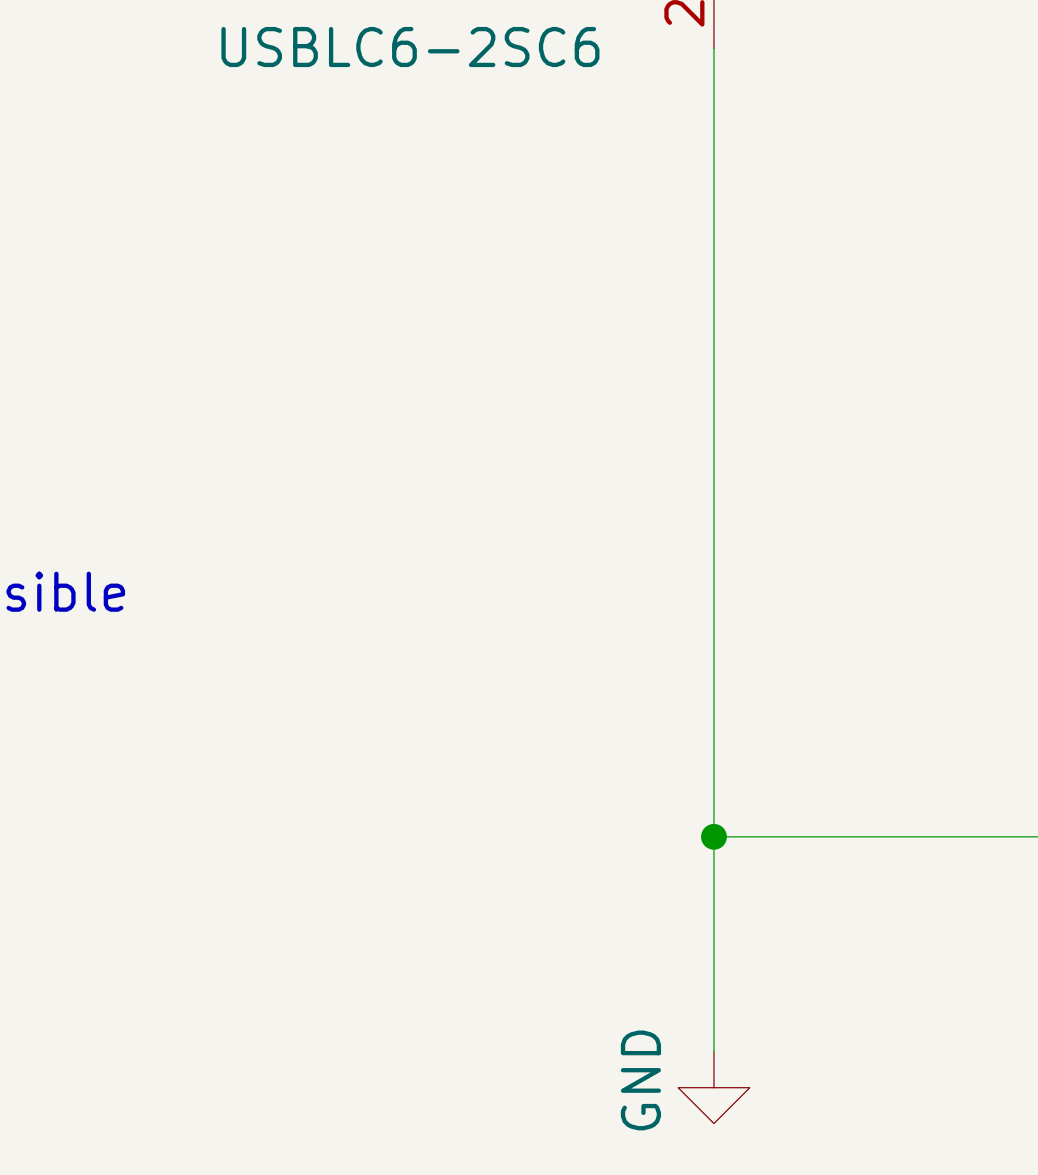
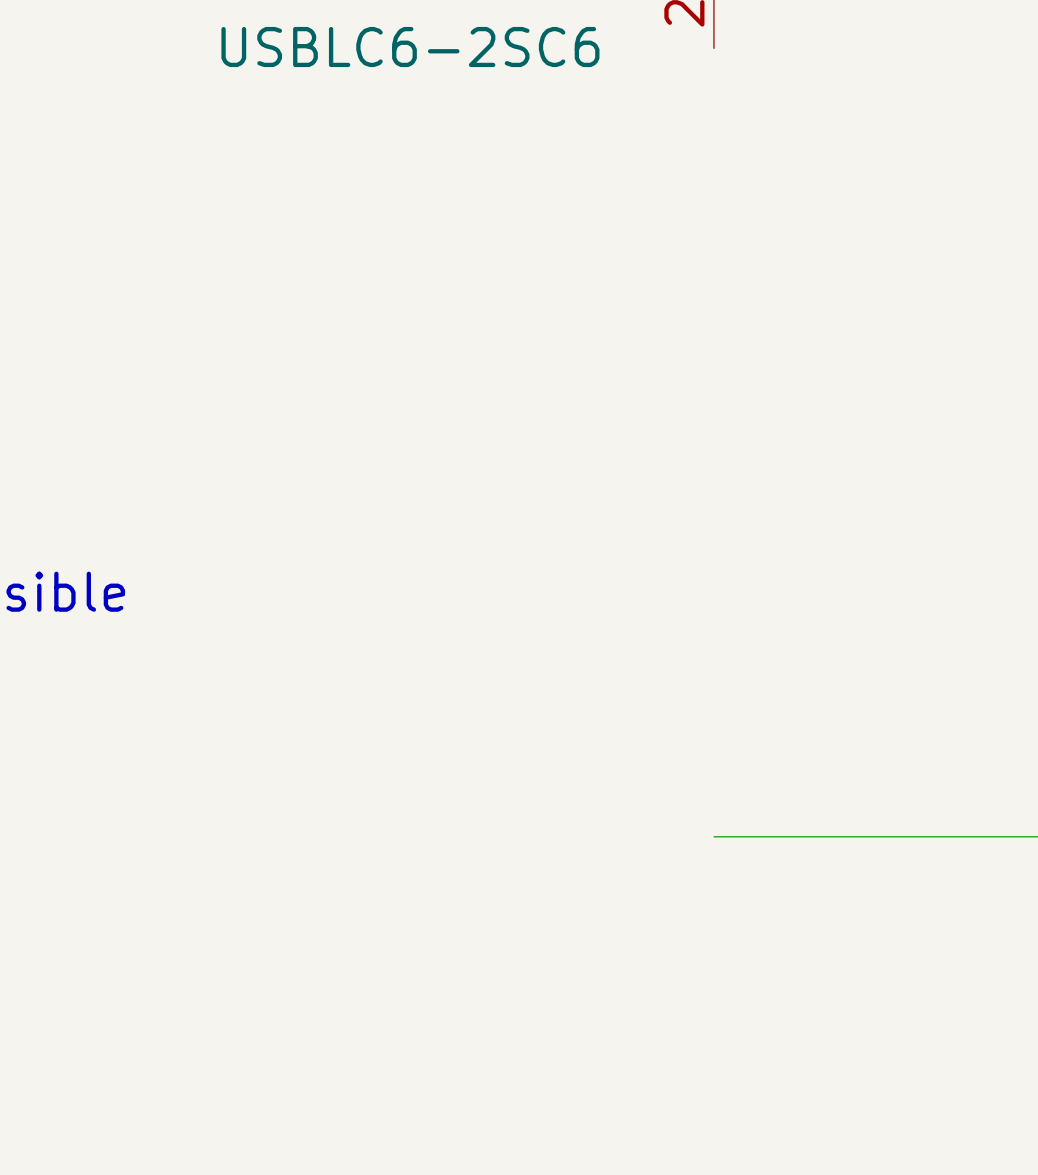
wire: (713, 48) (713, 1051) -> none
junction: (713, 836) -> none
power symbol: GND (713, 1087) -> none

